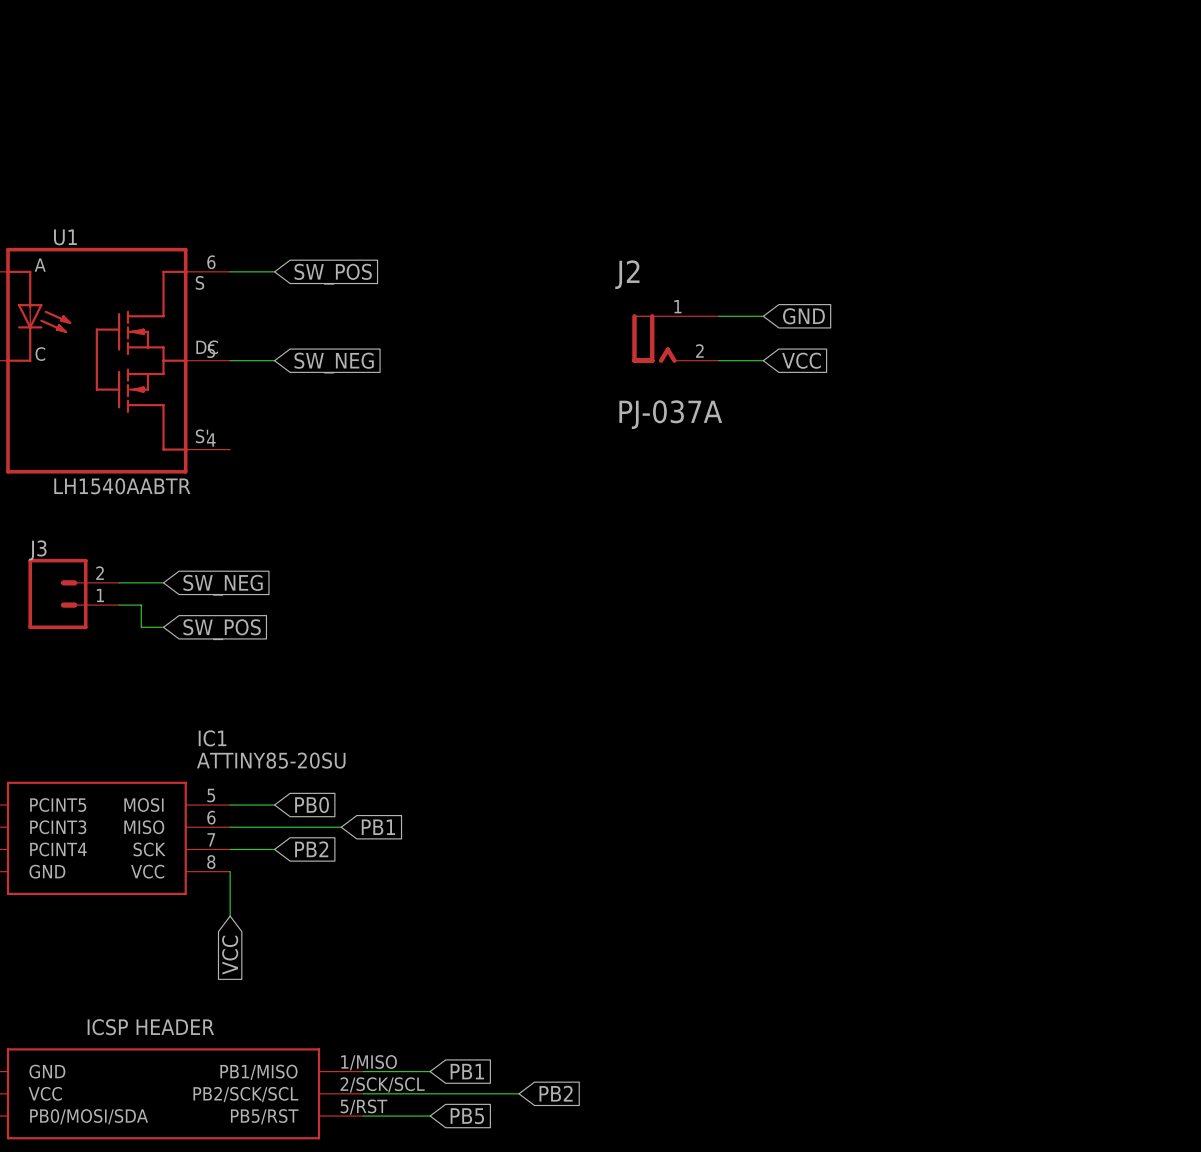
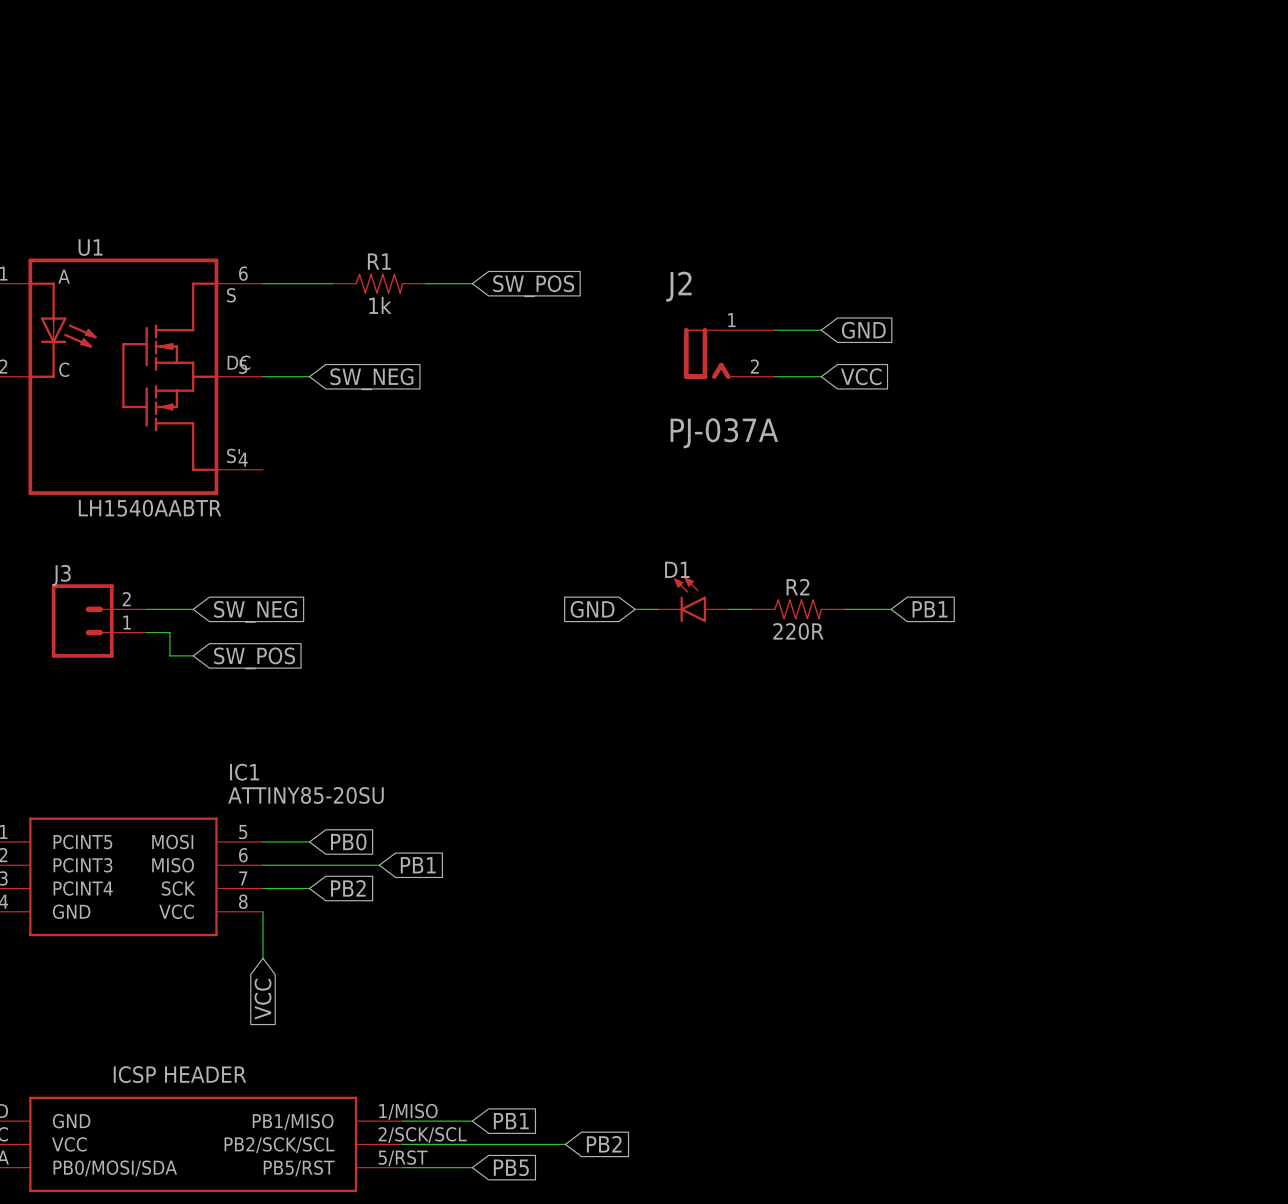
wire: none -> (309, 283) (332, 283)
R1: none -> 1k (379, 283)
wire: none -> (425, 283) (472, 283)
global label position: SW_POS (333, 274) -> SW_POS (533, 286)
D1: none -> (693, 599)
global label: none -> GND (592, 609)
wire: none -> (635, 609) (658, 609)
wire: none -> (728, 609) (751, 609)
R2: none -> 220R (798, 609)
wire: none -> (844, 609) (891, 609)
global label: none -> PB1 (930, 609)

